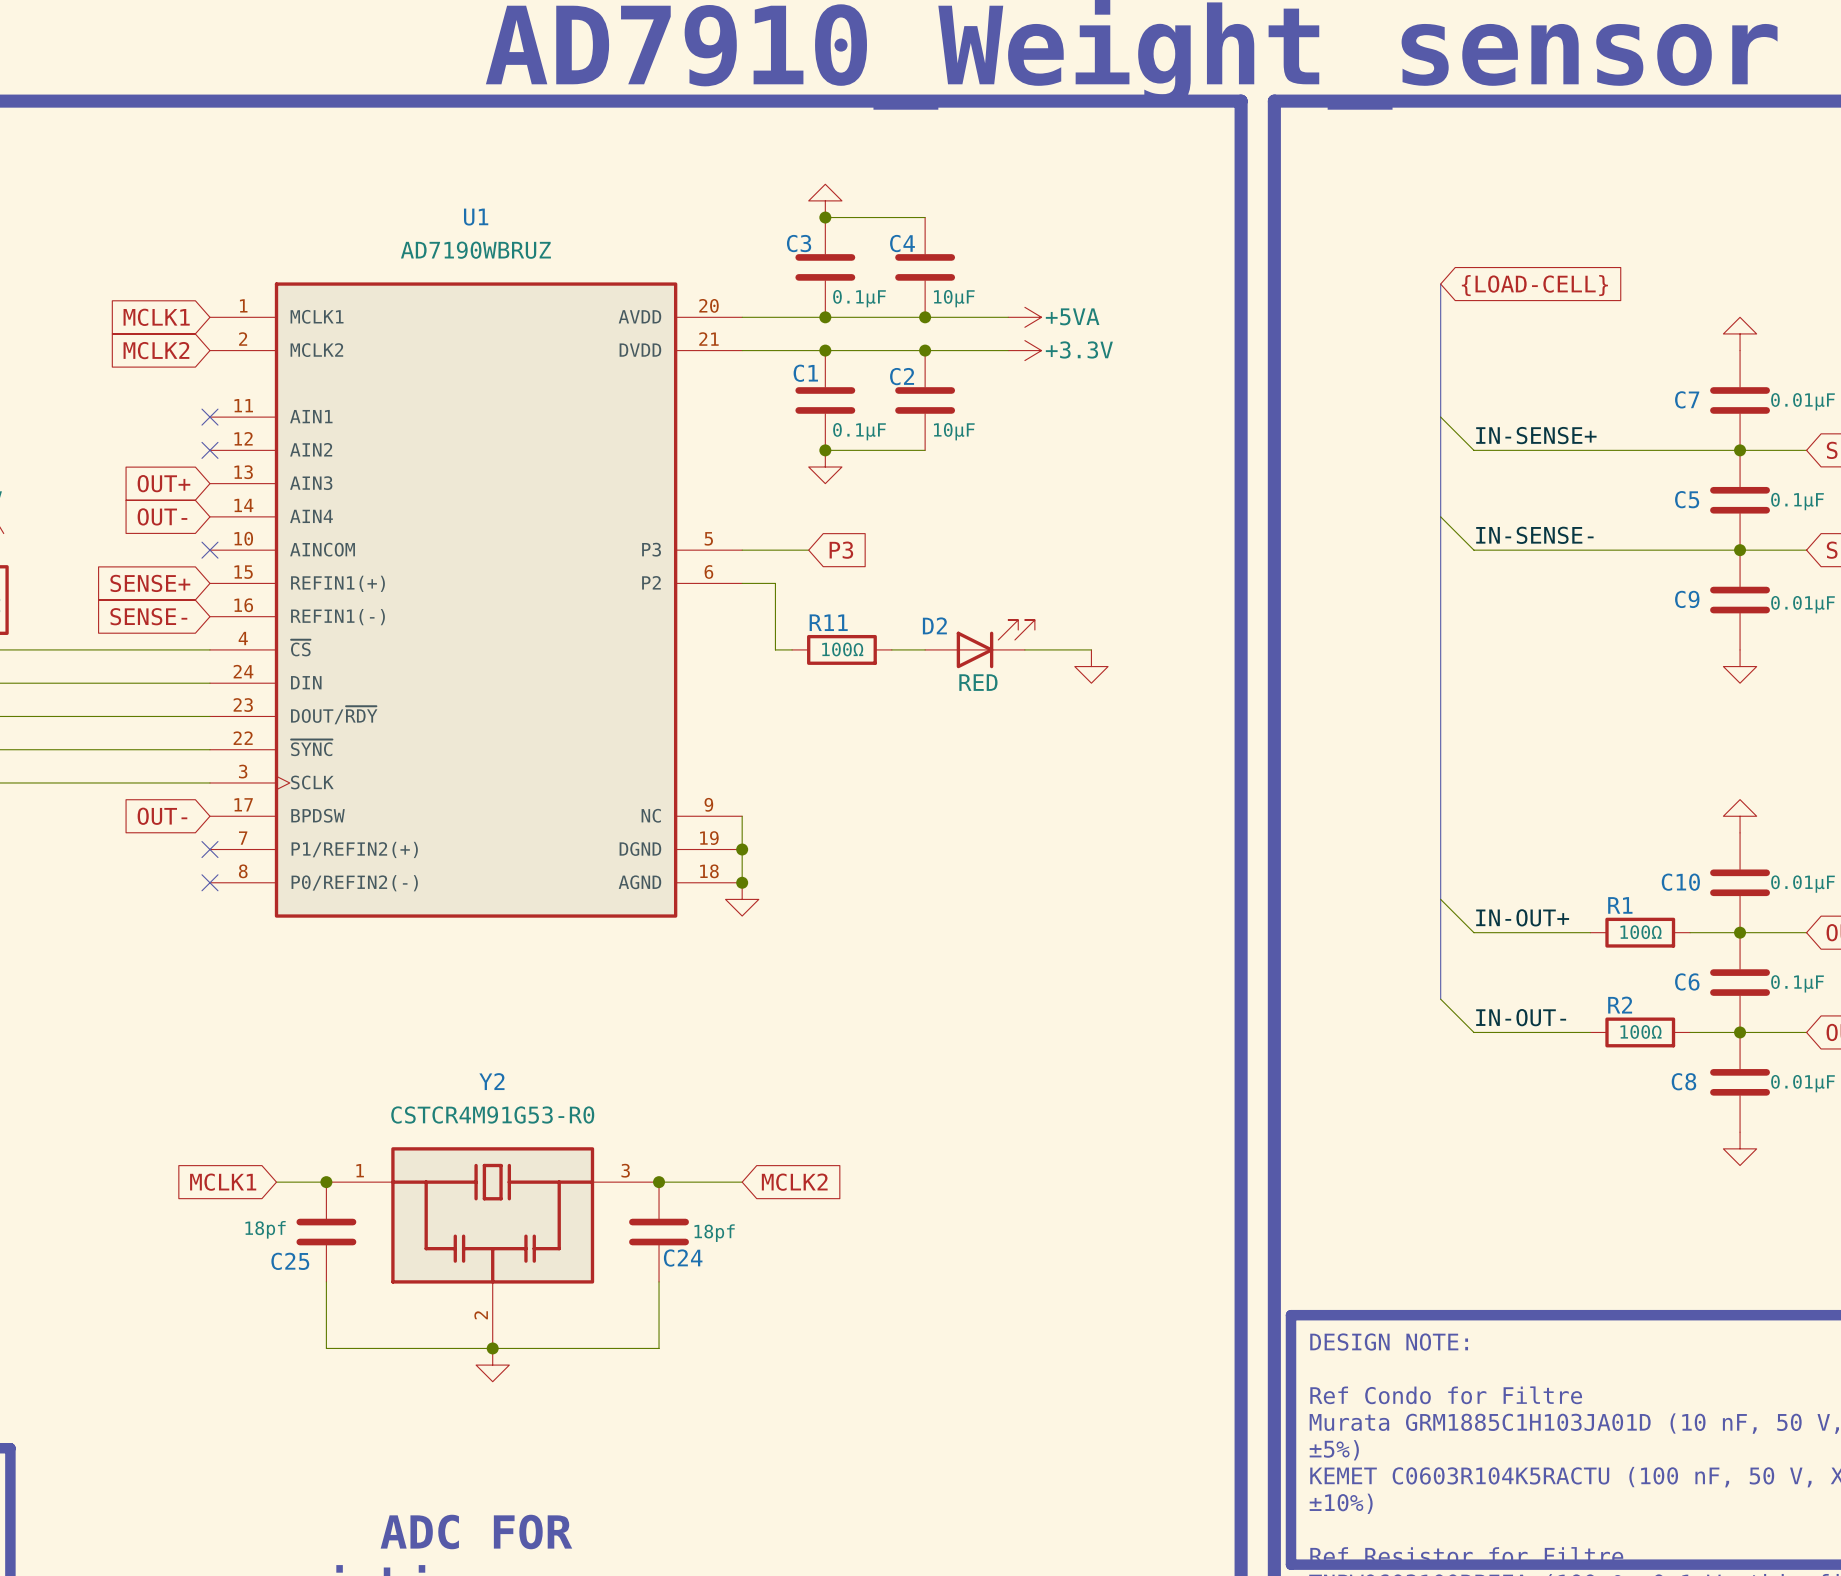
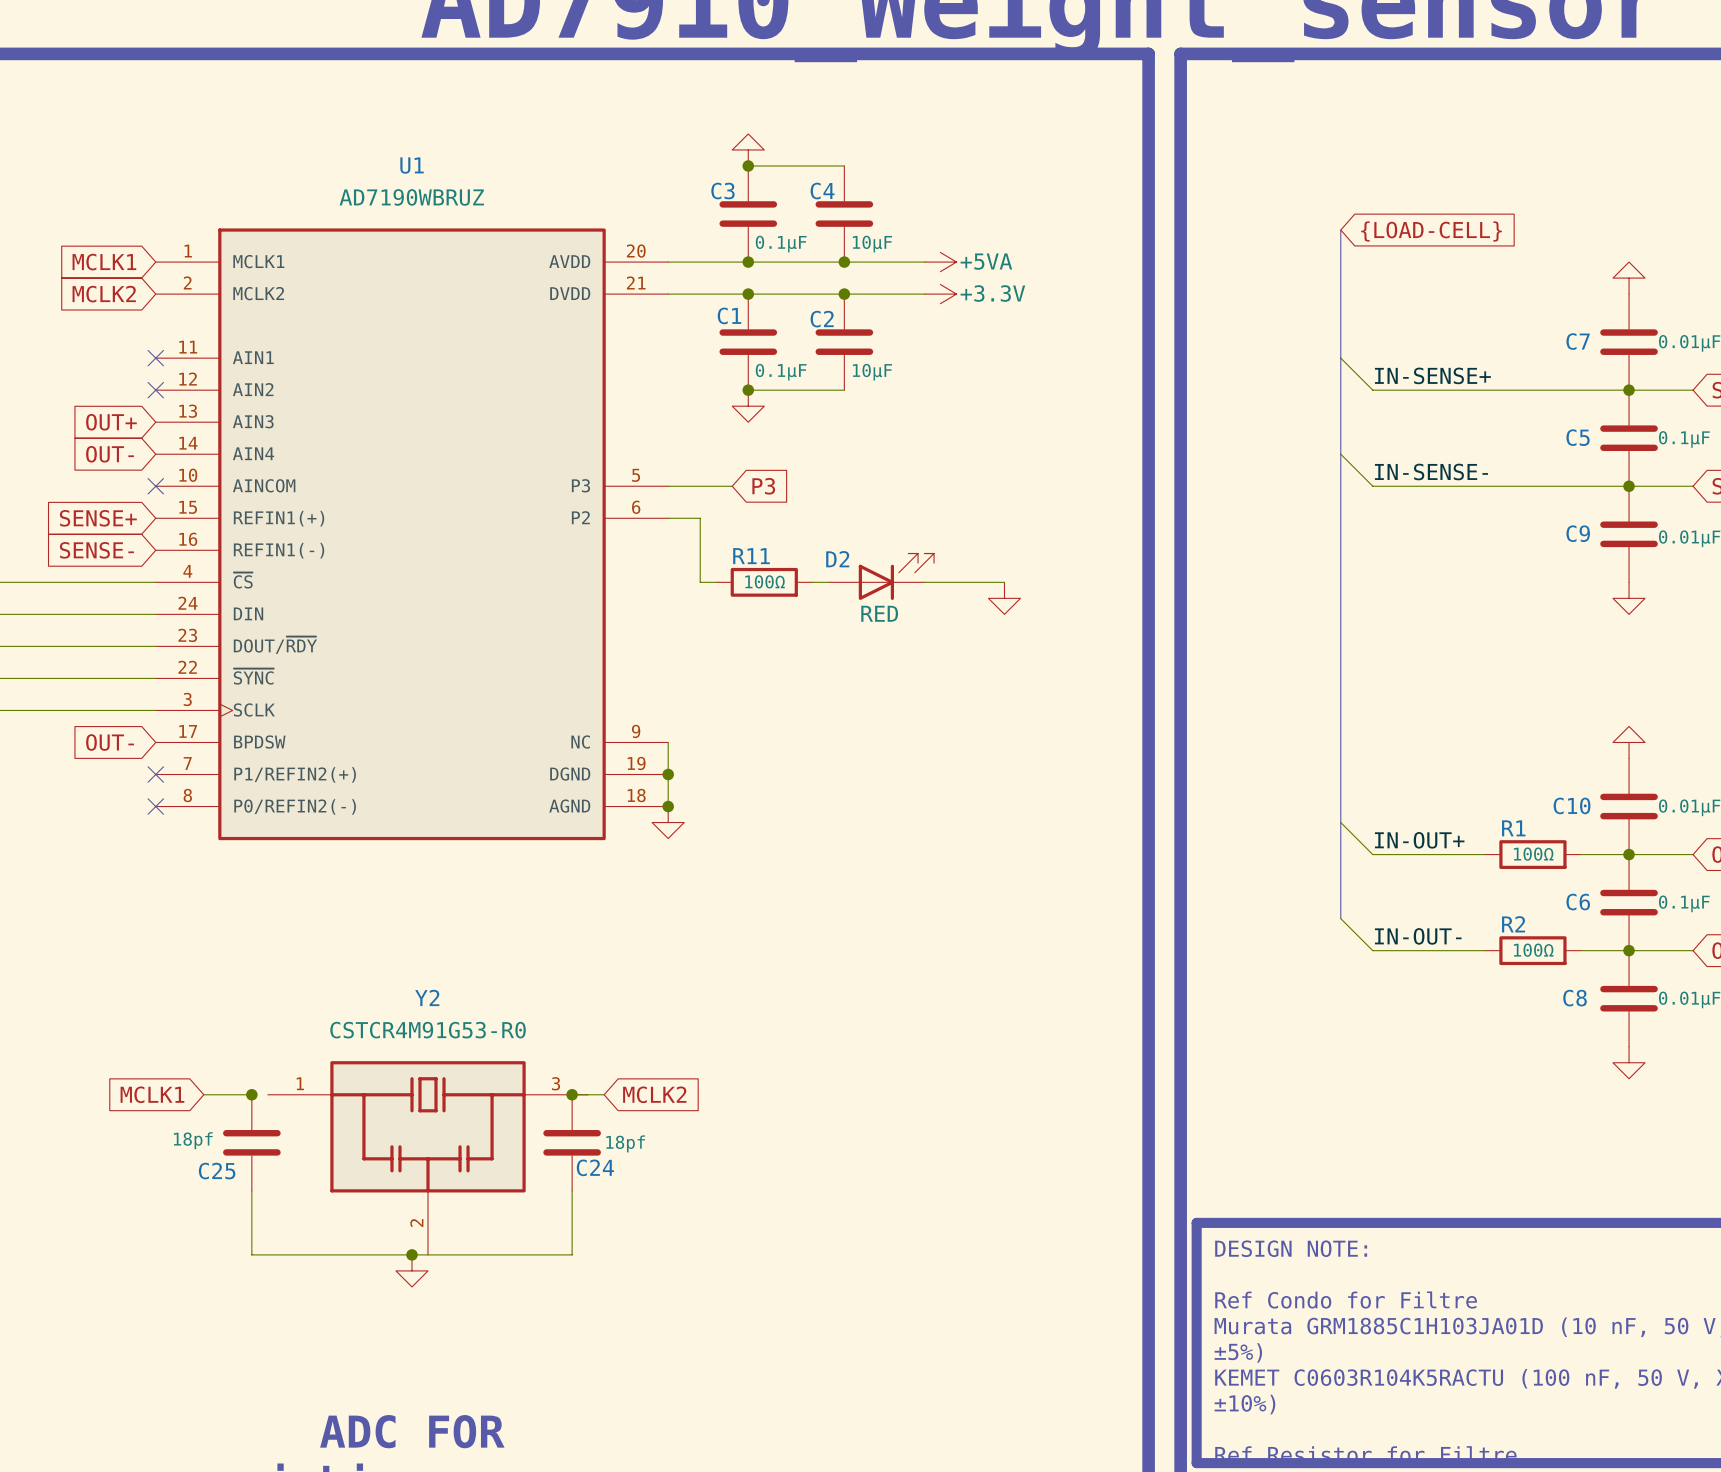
D2 position: (980, 644) -> (881, 576)
global label position: MCLK1 (223, 1182) -> MCLK1 (152, 1094)
wire: (309, 1182) (326, 1182) -> (203, 1094) (219, 1094)
junction position: (326, 1182) -> (251, 1094)
junction position: (659, 1182) -> (572, 1094)
wire: (675, 1182) (742, 1182) -> none
global label position: MCLK2 (794, 1182) -> MCLK2 (654, 1094)
C25 position: (326, 1232) -> (251, 1142)
C24 position: (659, 1232) -> (572, 1142)
wire: (326, 1281) (326, 1348) -> (251, 1190) (251, 1254) (267, 1254)
wire: (659, 1281) (659, 1348) (642, 1348) -> (572, 1190) (572, 1254)
junction position: (492, 1348) -> (411, 1254)
power symbol position: (492, 1365) -> (411, 1270)

